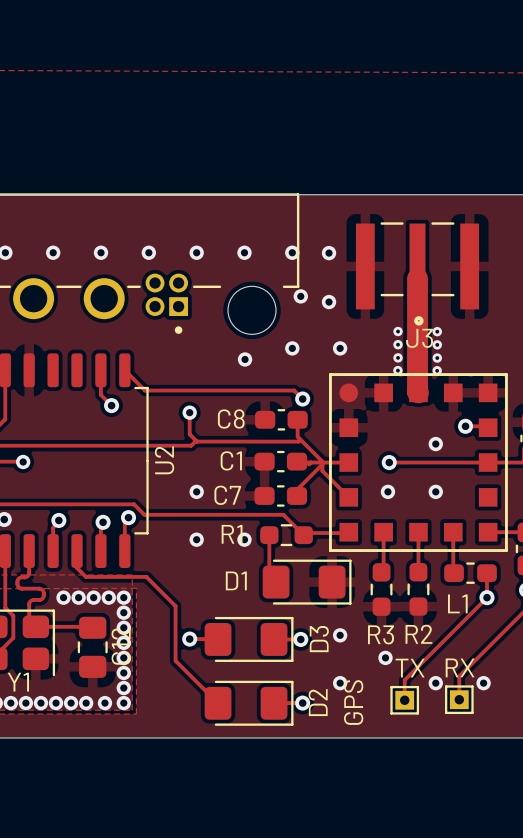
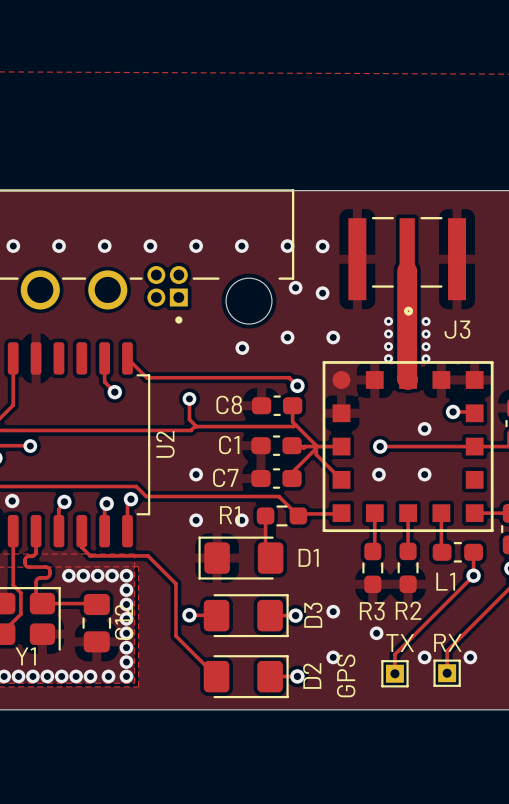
J3 name position: J3 (419, 338) -> J3 (457, 329)
D1 rotation: 0° (307, 582) -> 180° (240, 558)
D1 position: (307, 582) -> (240, 558)

